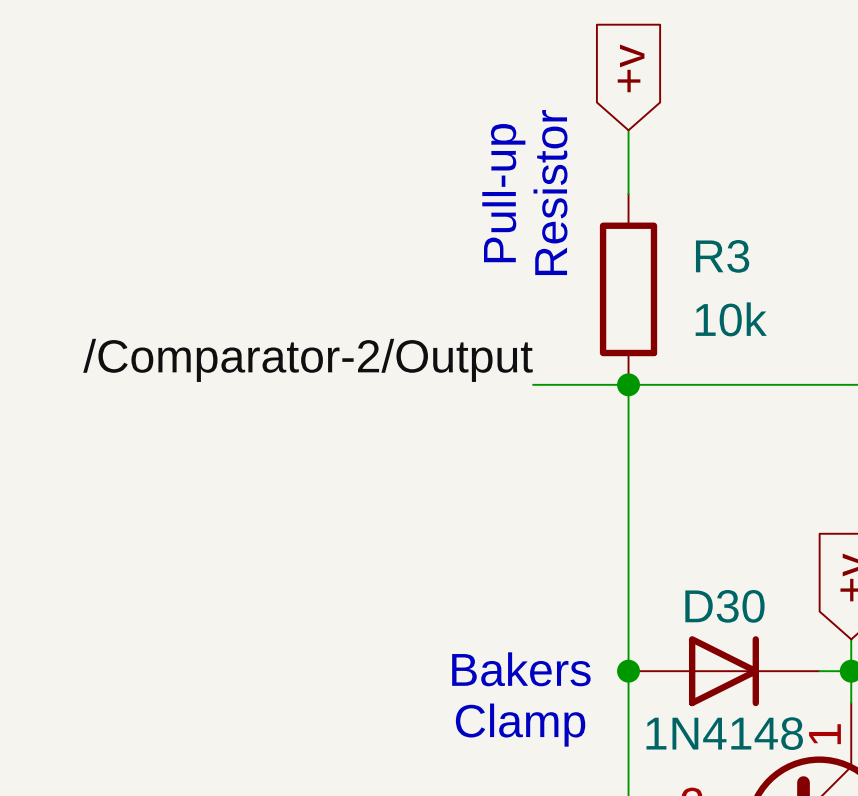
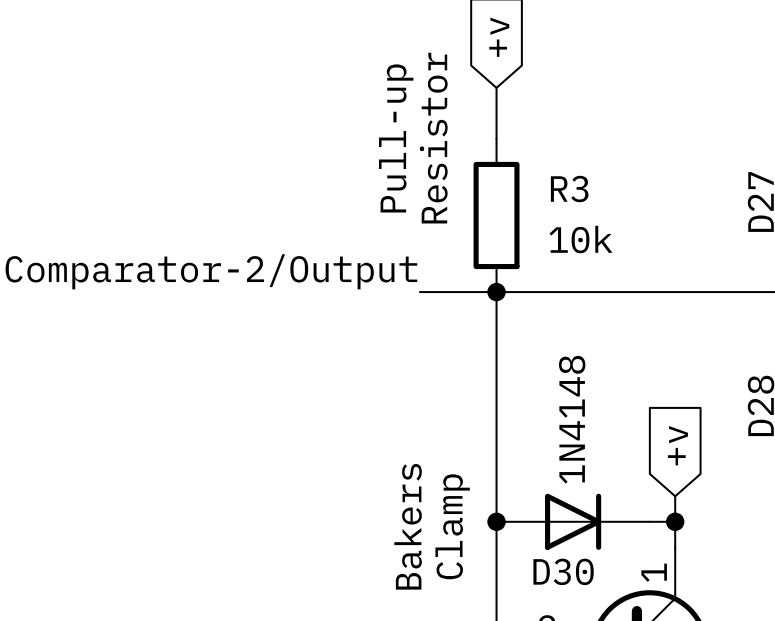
D30 name position: D30 (724, 606) -> D30 (563, 571)
text rotation: 0° (521, 669) -> 90° counterclockwise (408, 526)
text rotation: 0° (520, 725) -> 90° counterclockwise (452, 526)
D30 value rotation: 0° (724, 733) -> 90° counterclockwise (572, 419)

